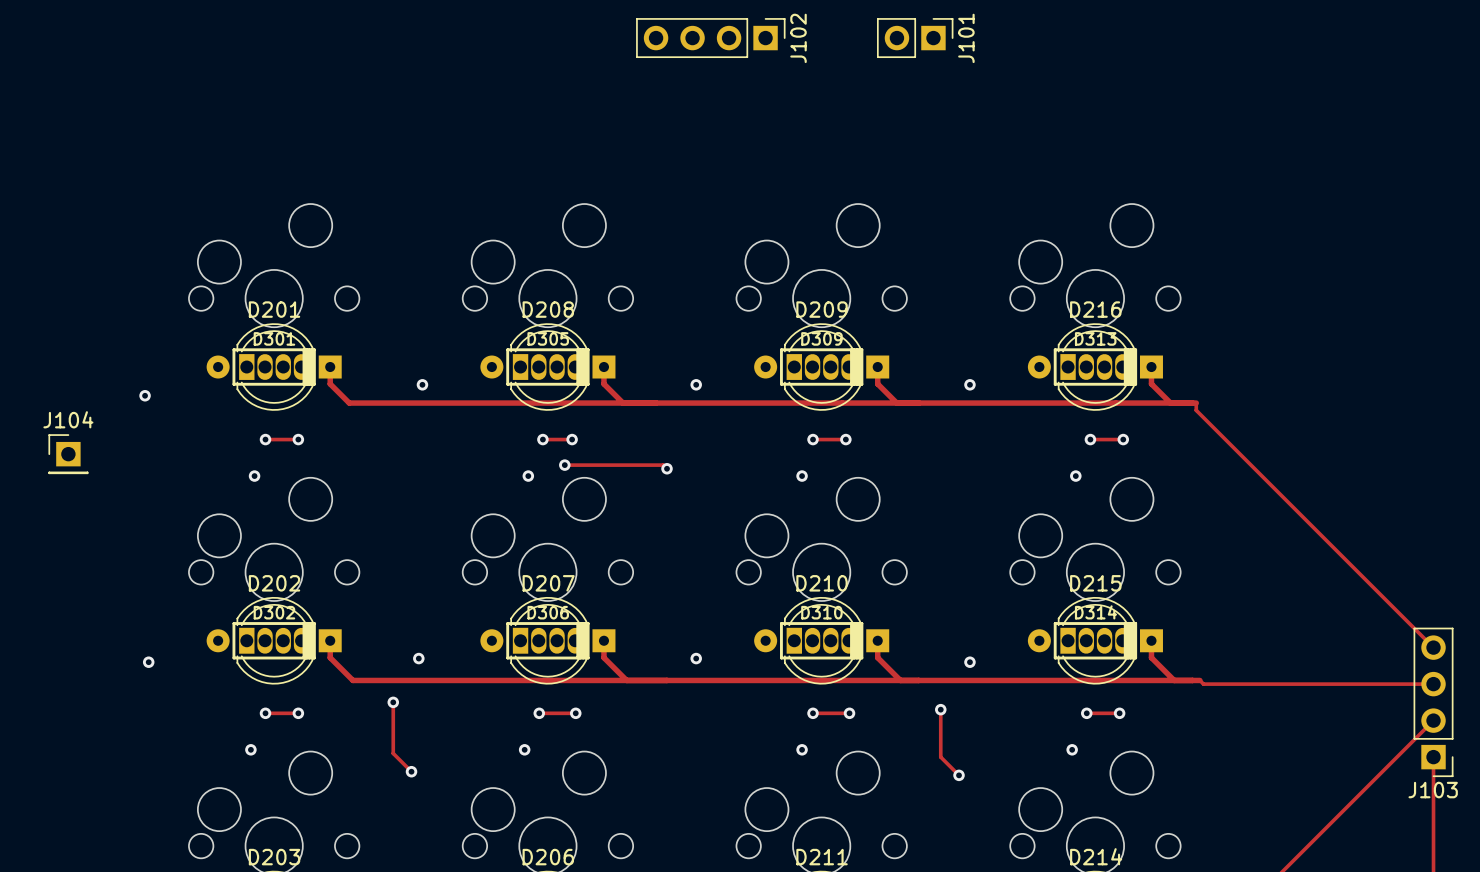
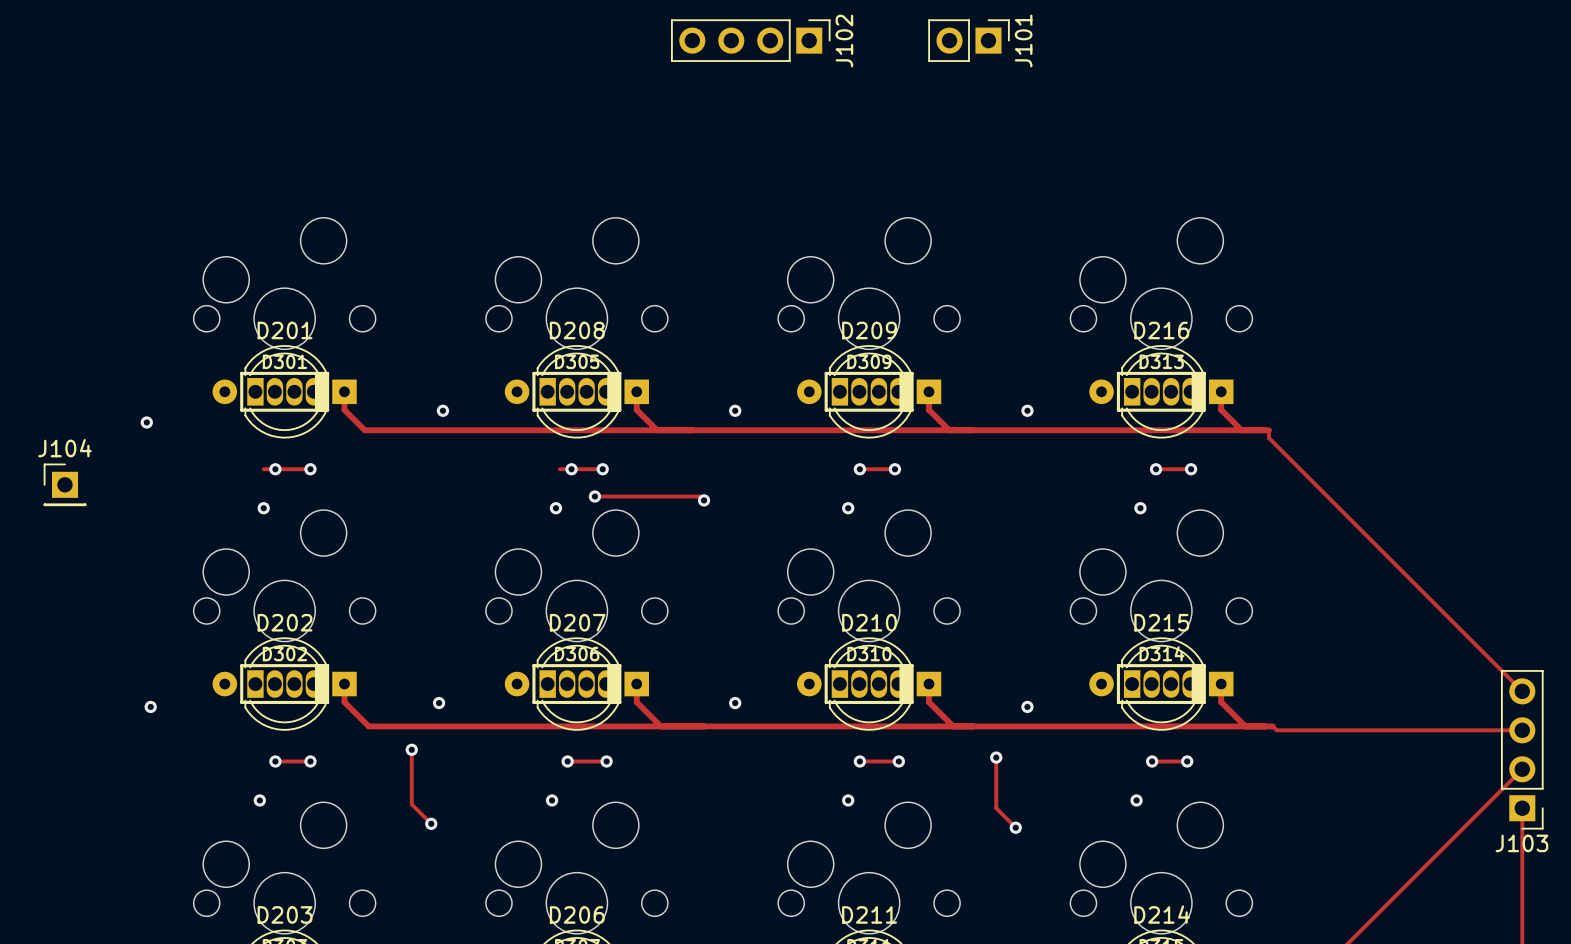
track: none -> (263, 469) (275, 469)
track: none -> (559, 469) (571, 469)

